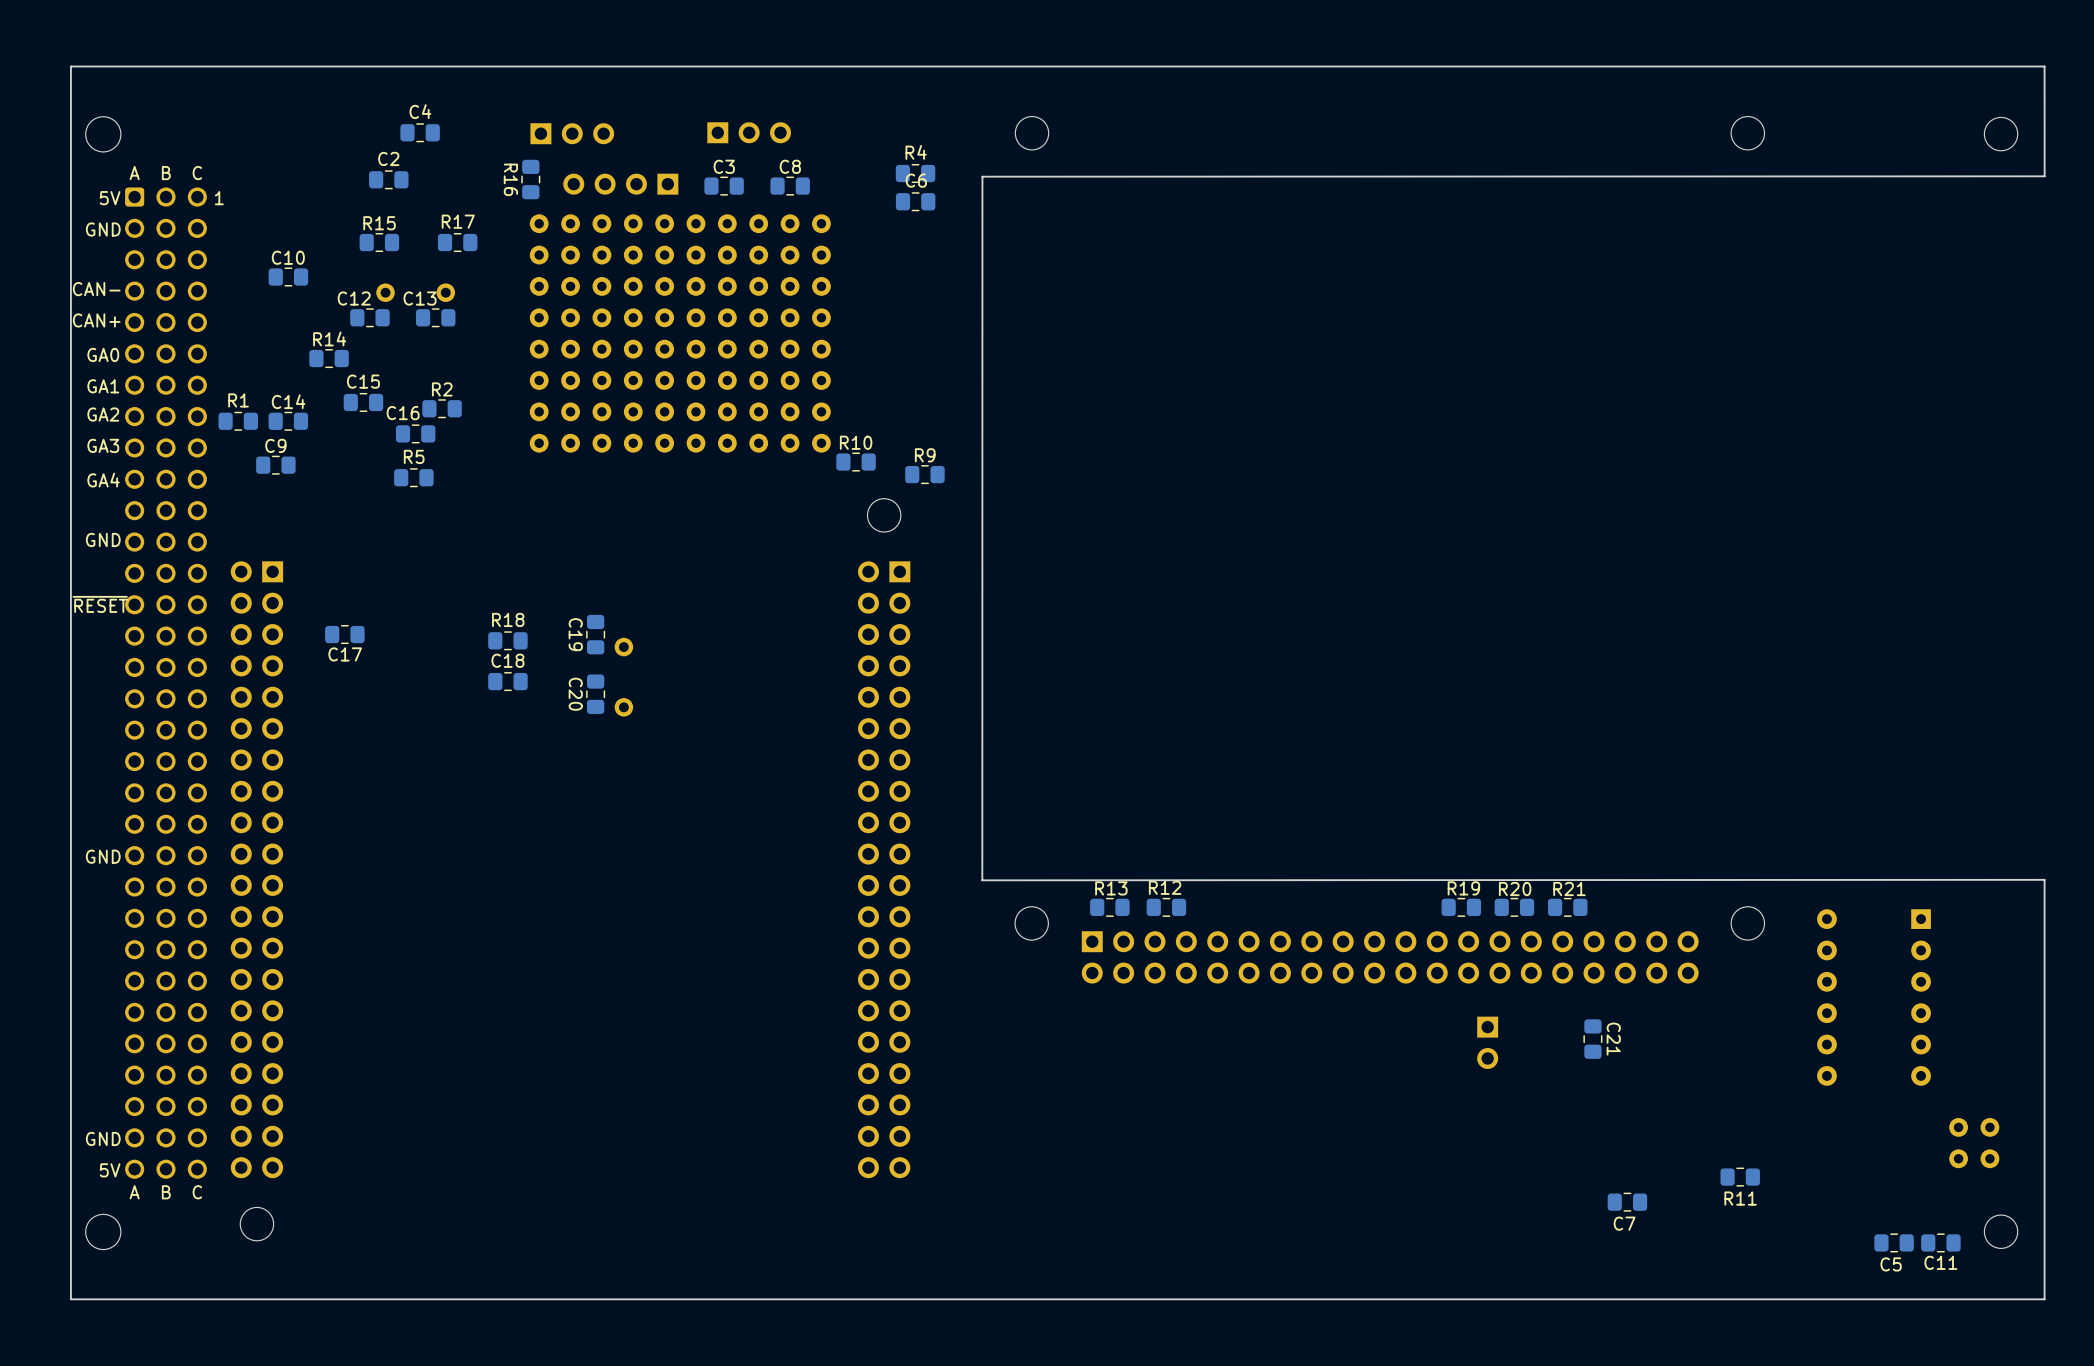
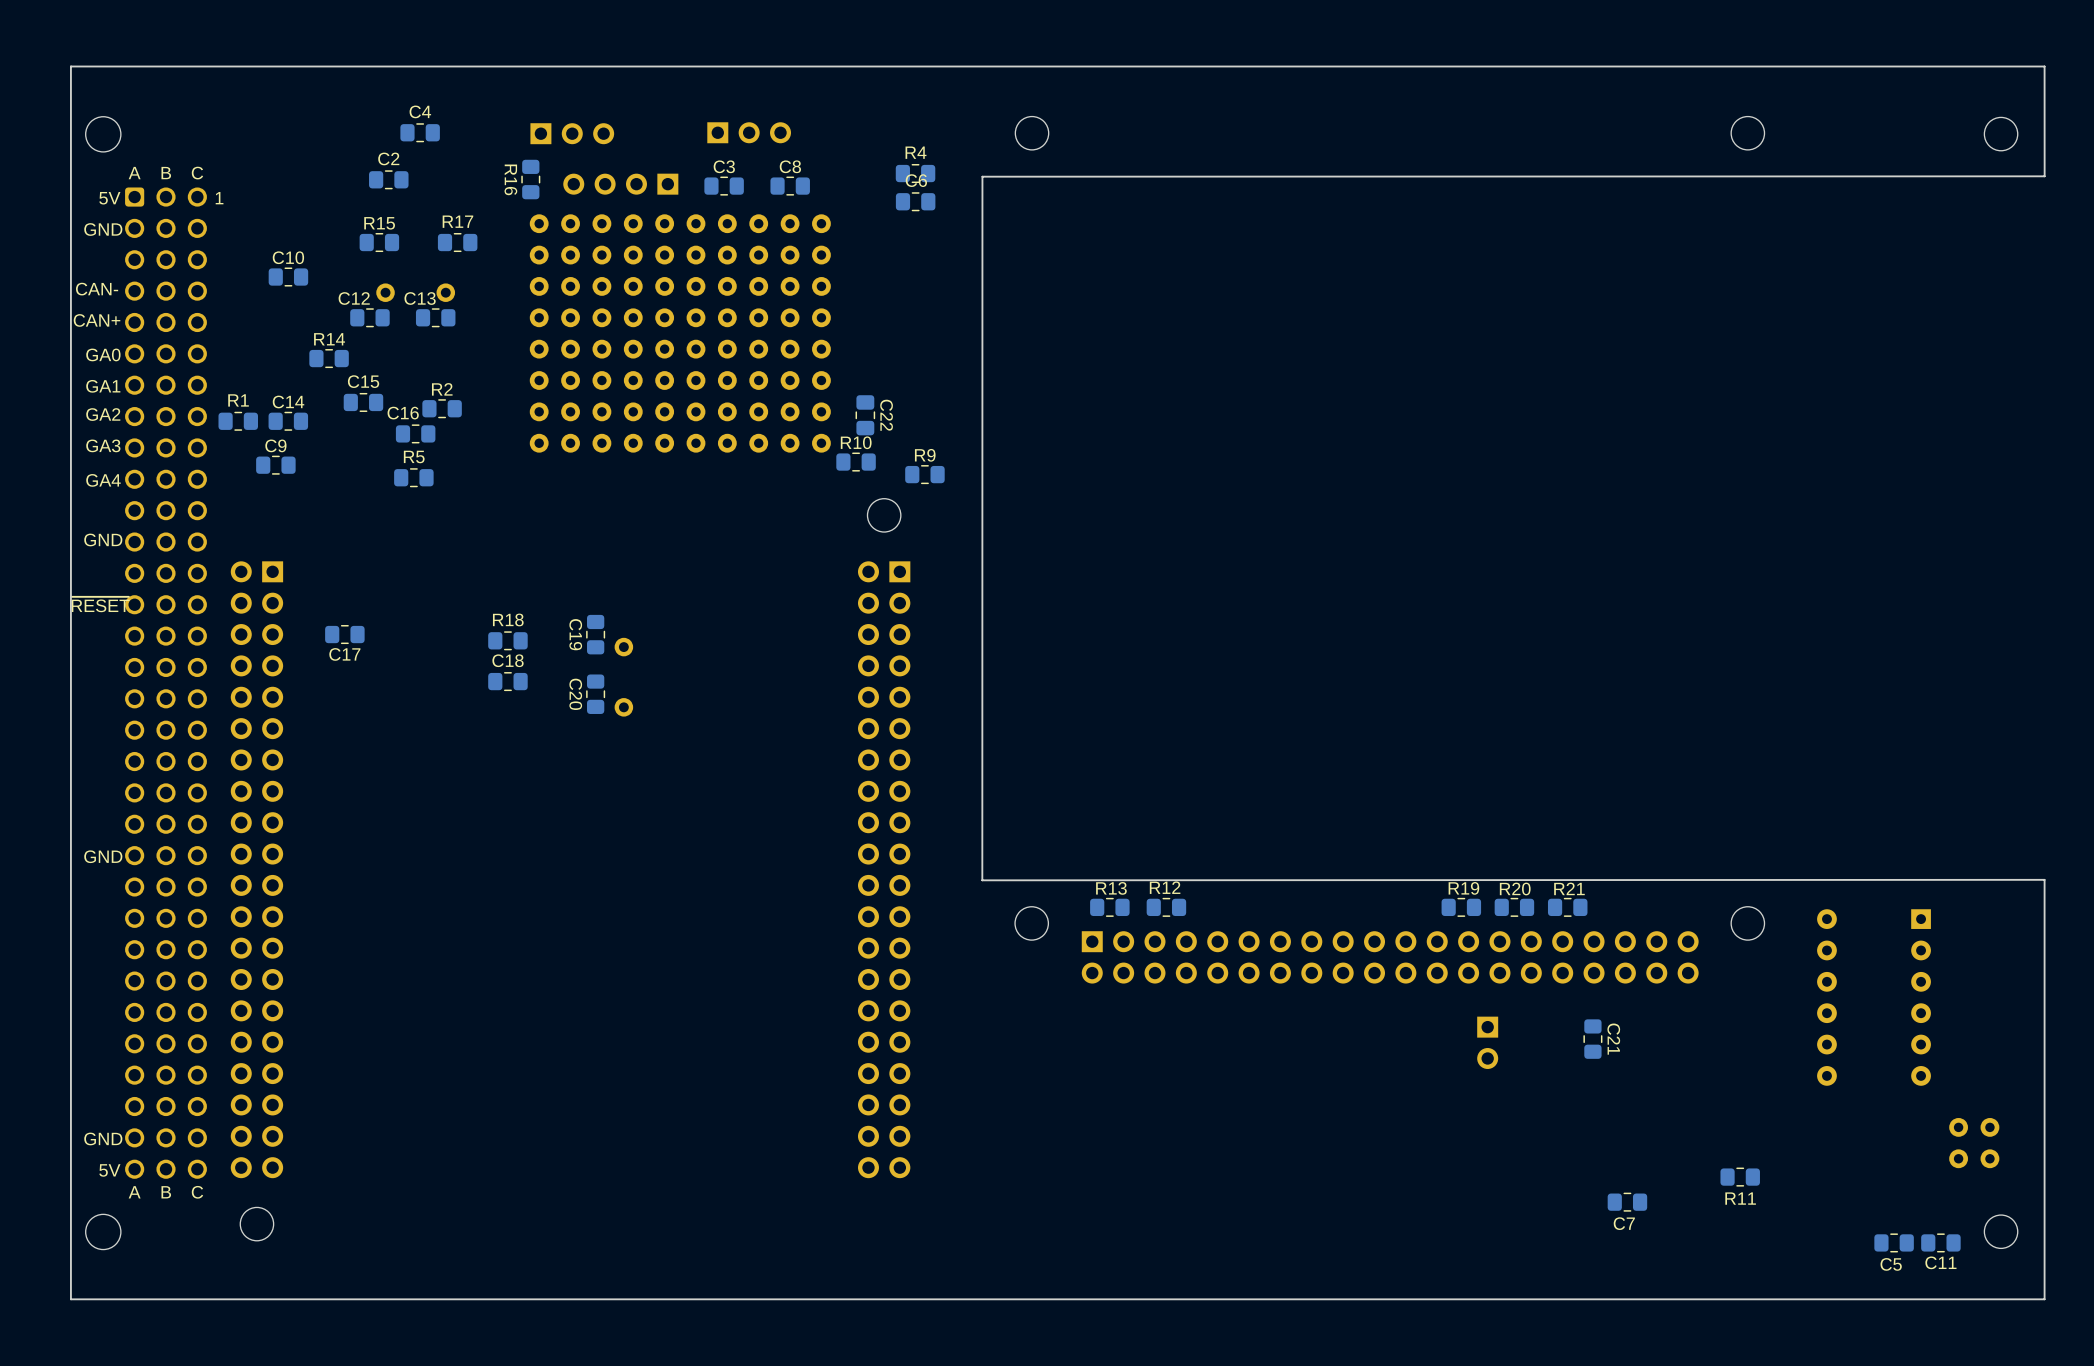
C22: none -> (865, 415)

